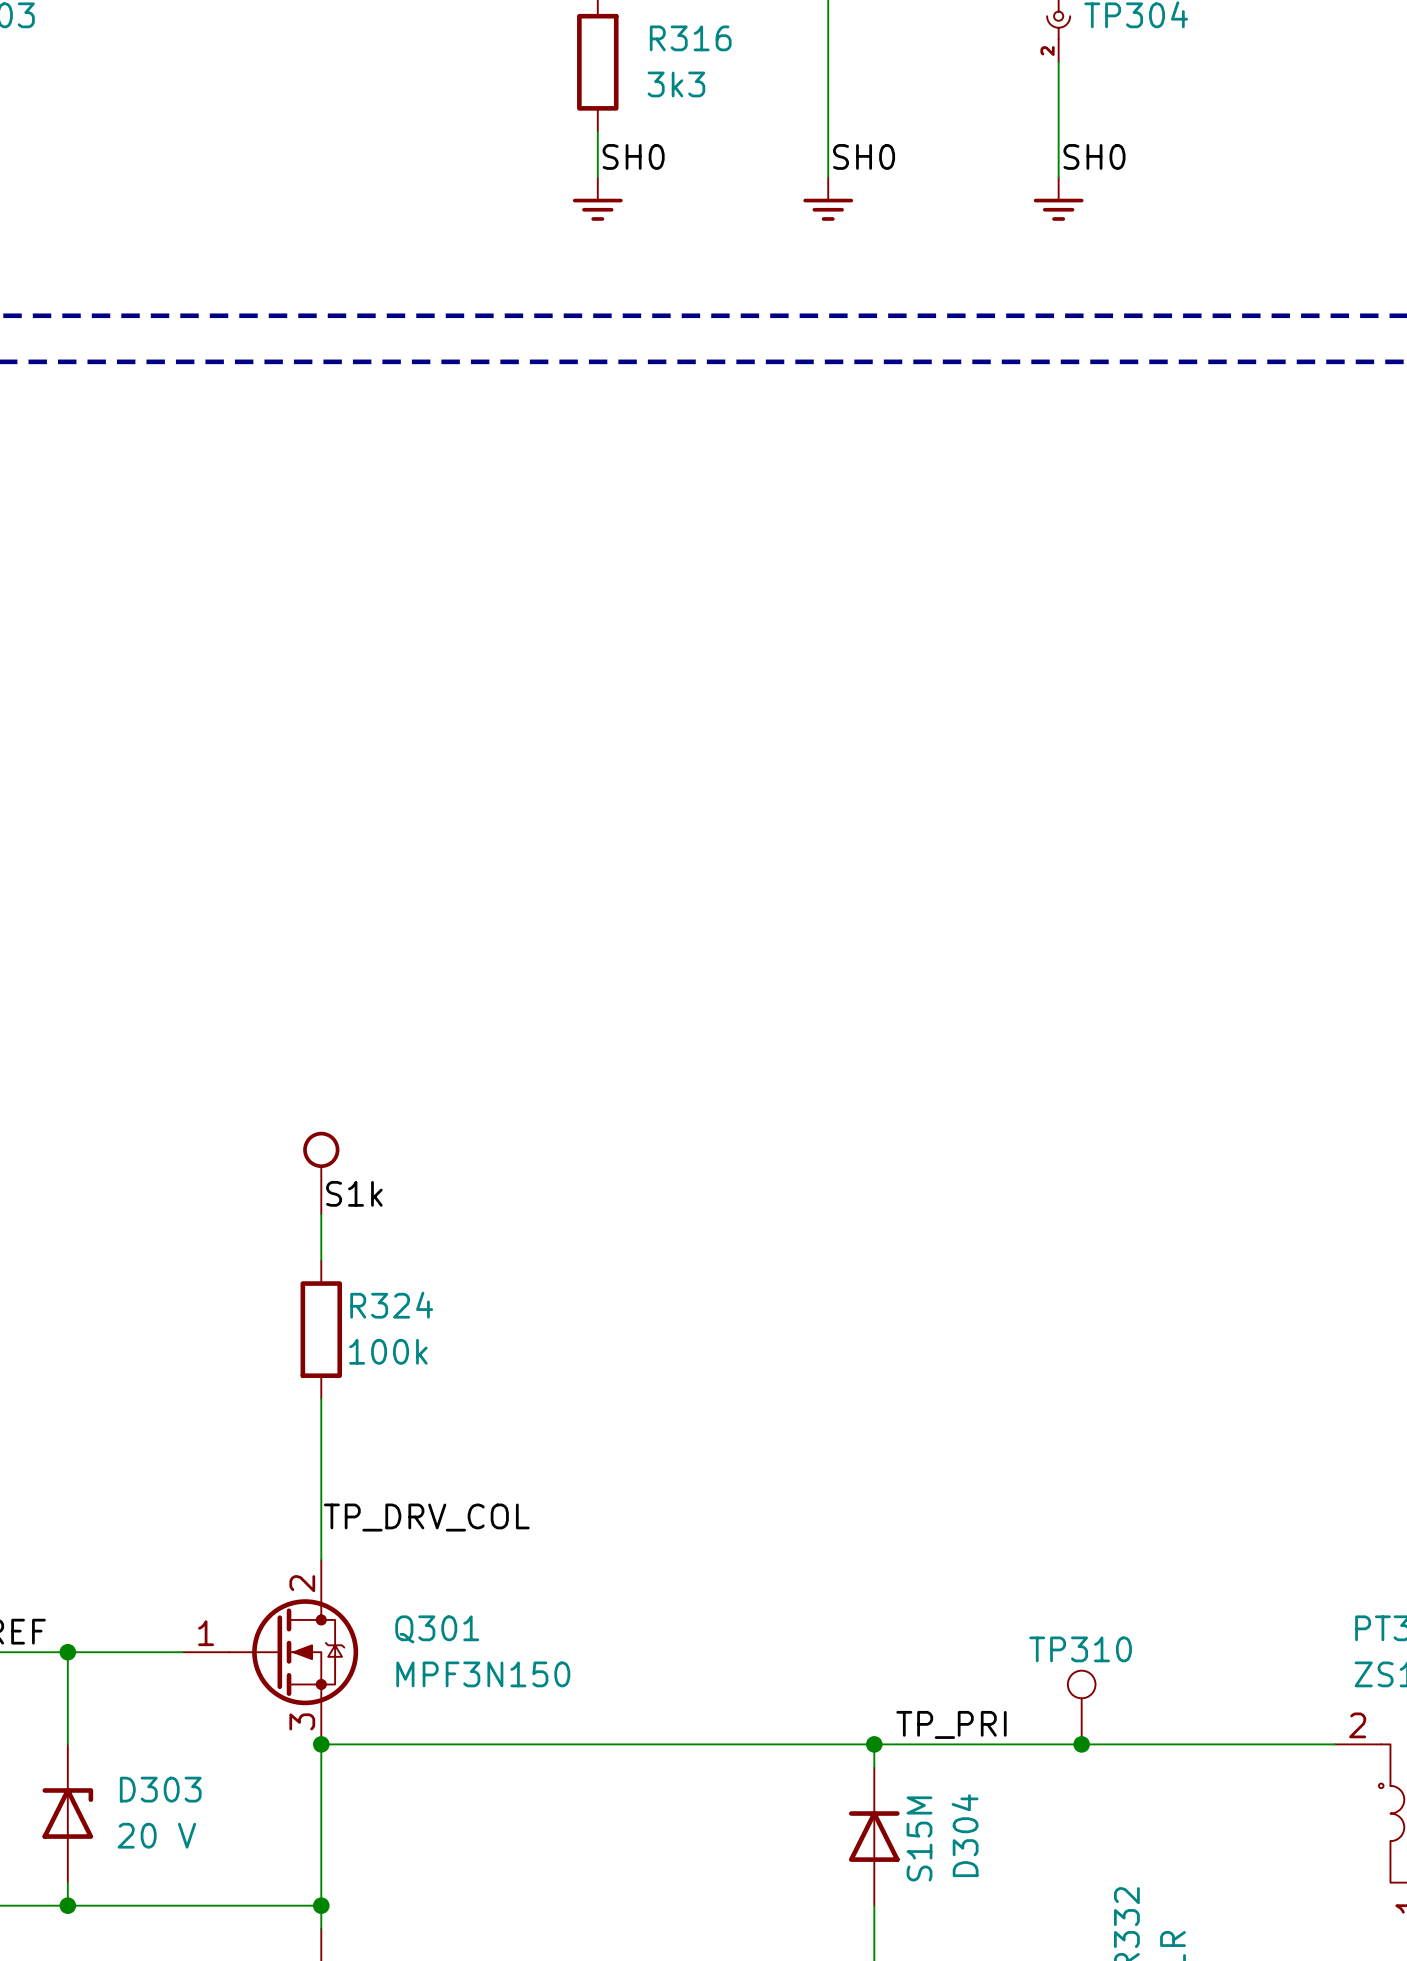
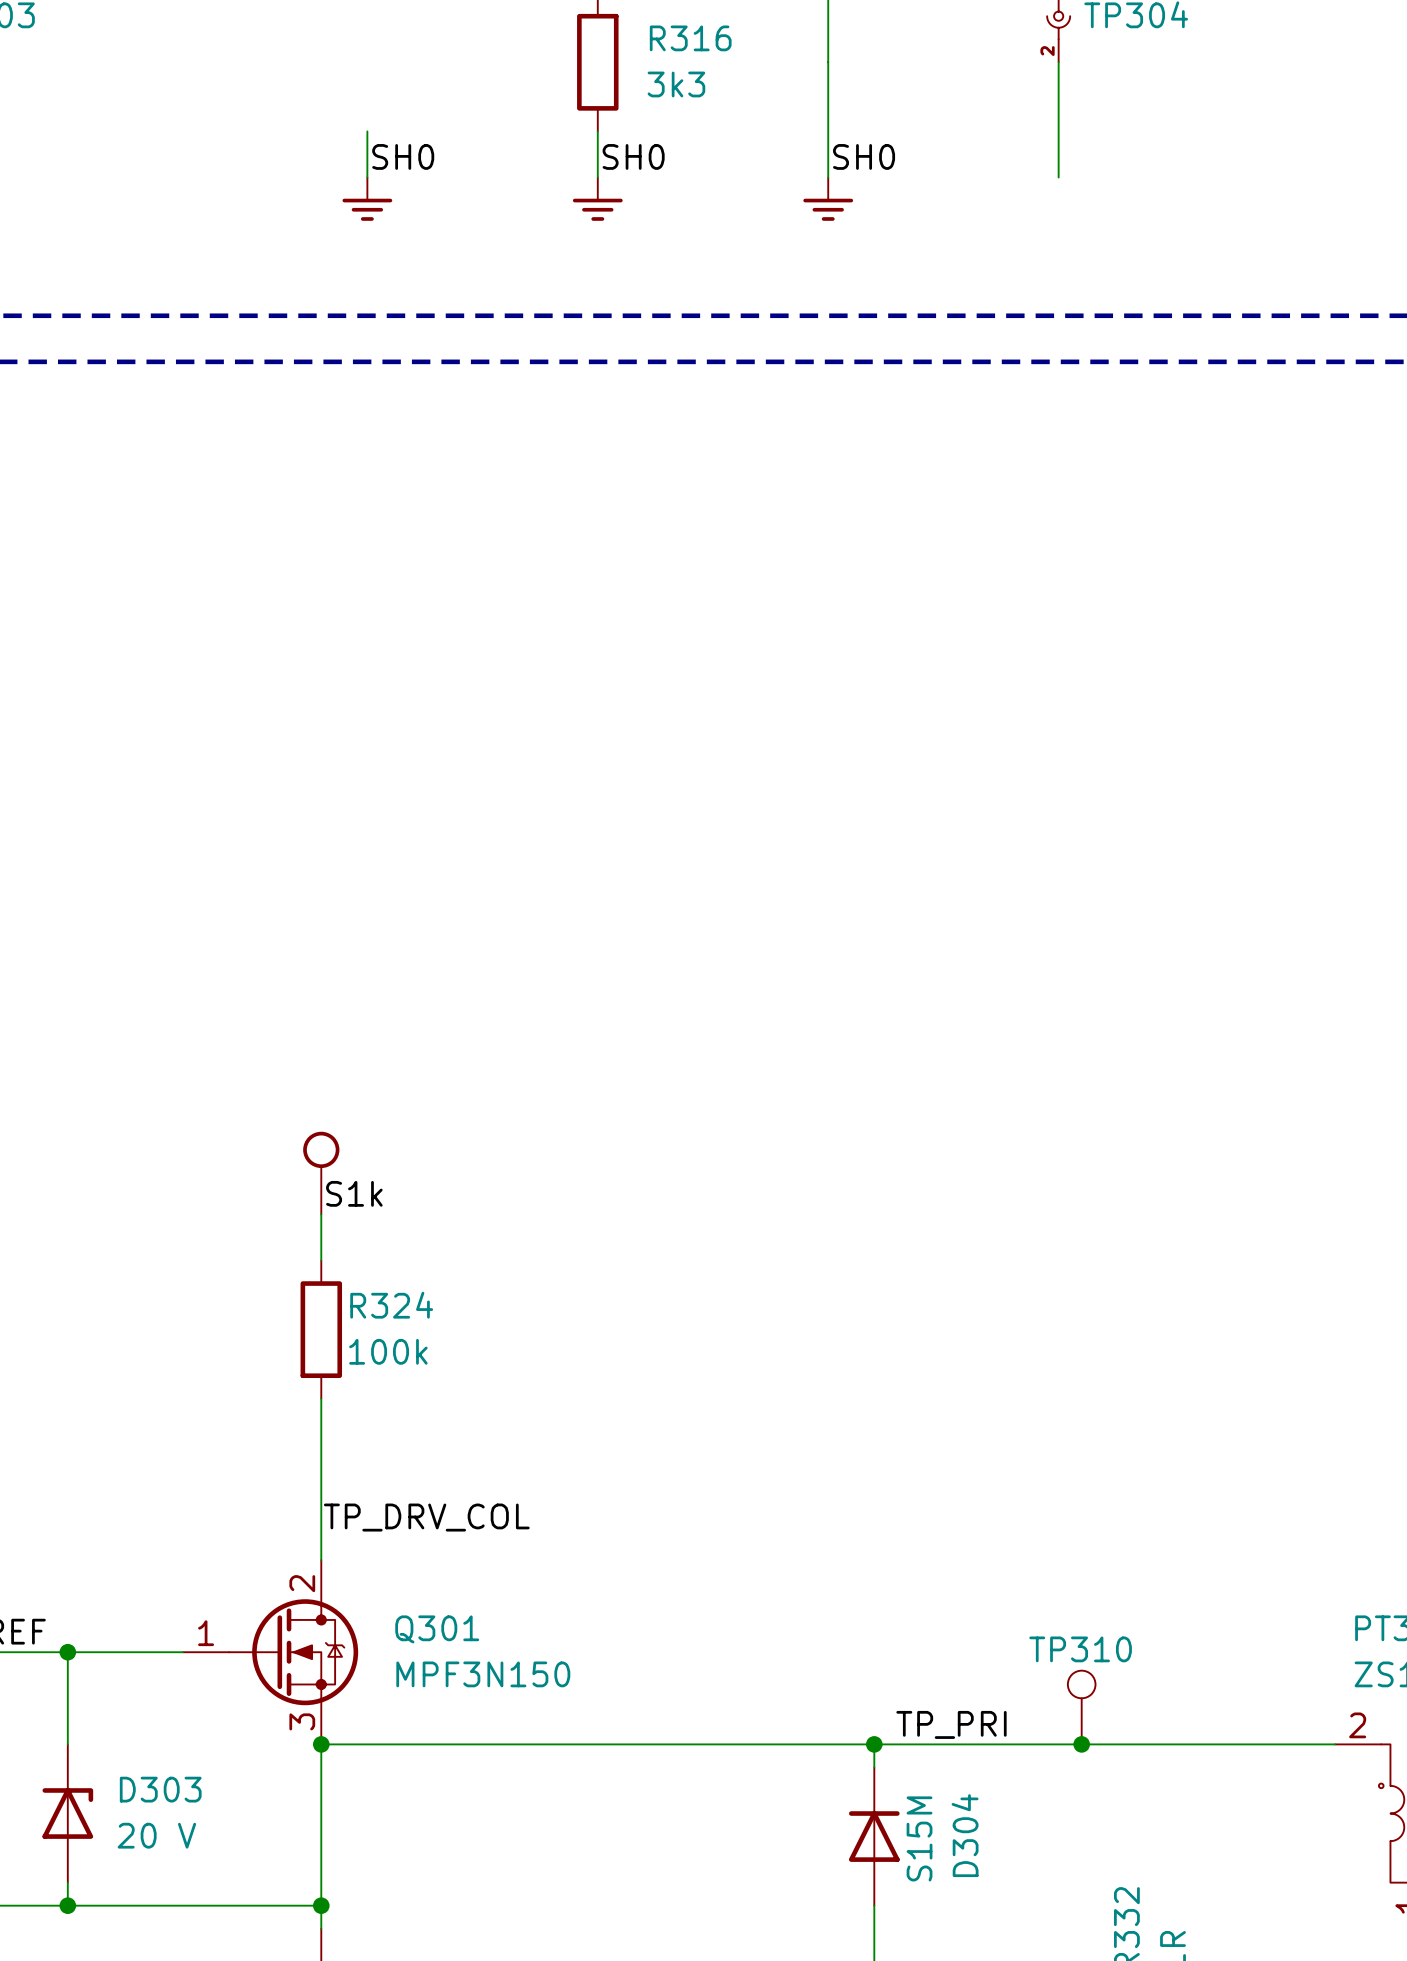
wire: none -> (367, 131) (367, 177)
label: none -> SH0 (403, 156)
label: SH0 (1094, 156) -> none
part: none -> (367, 199)
part: (1058, 199) -> none

